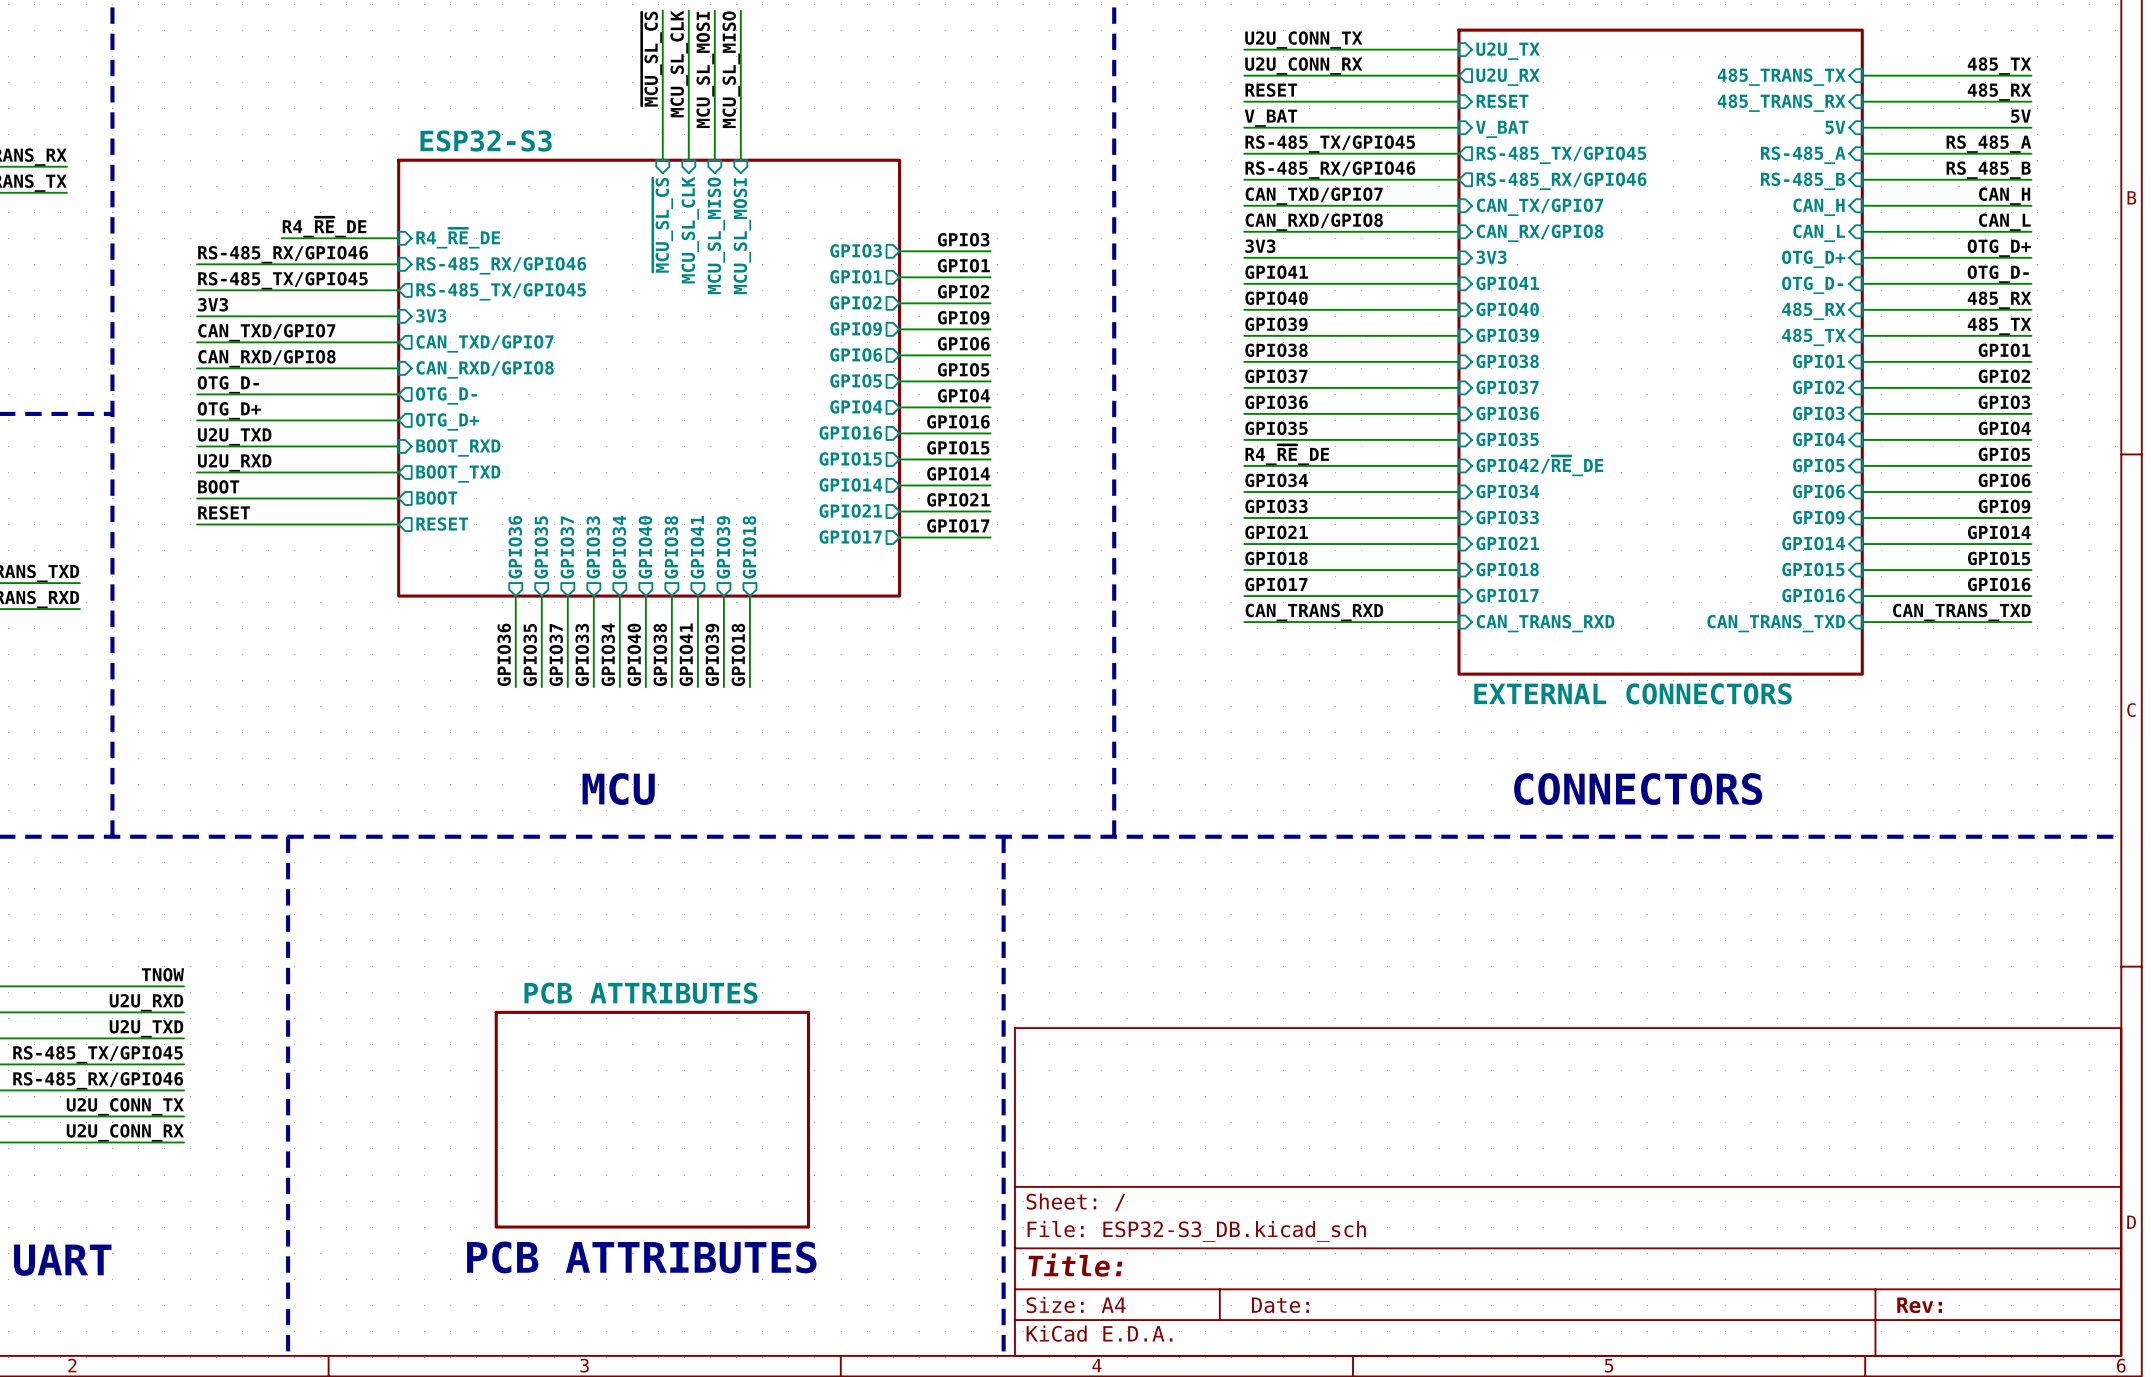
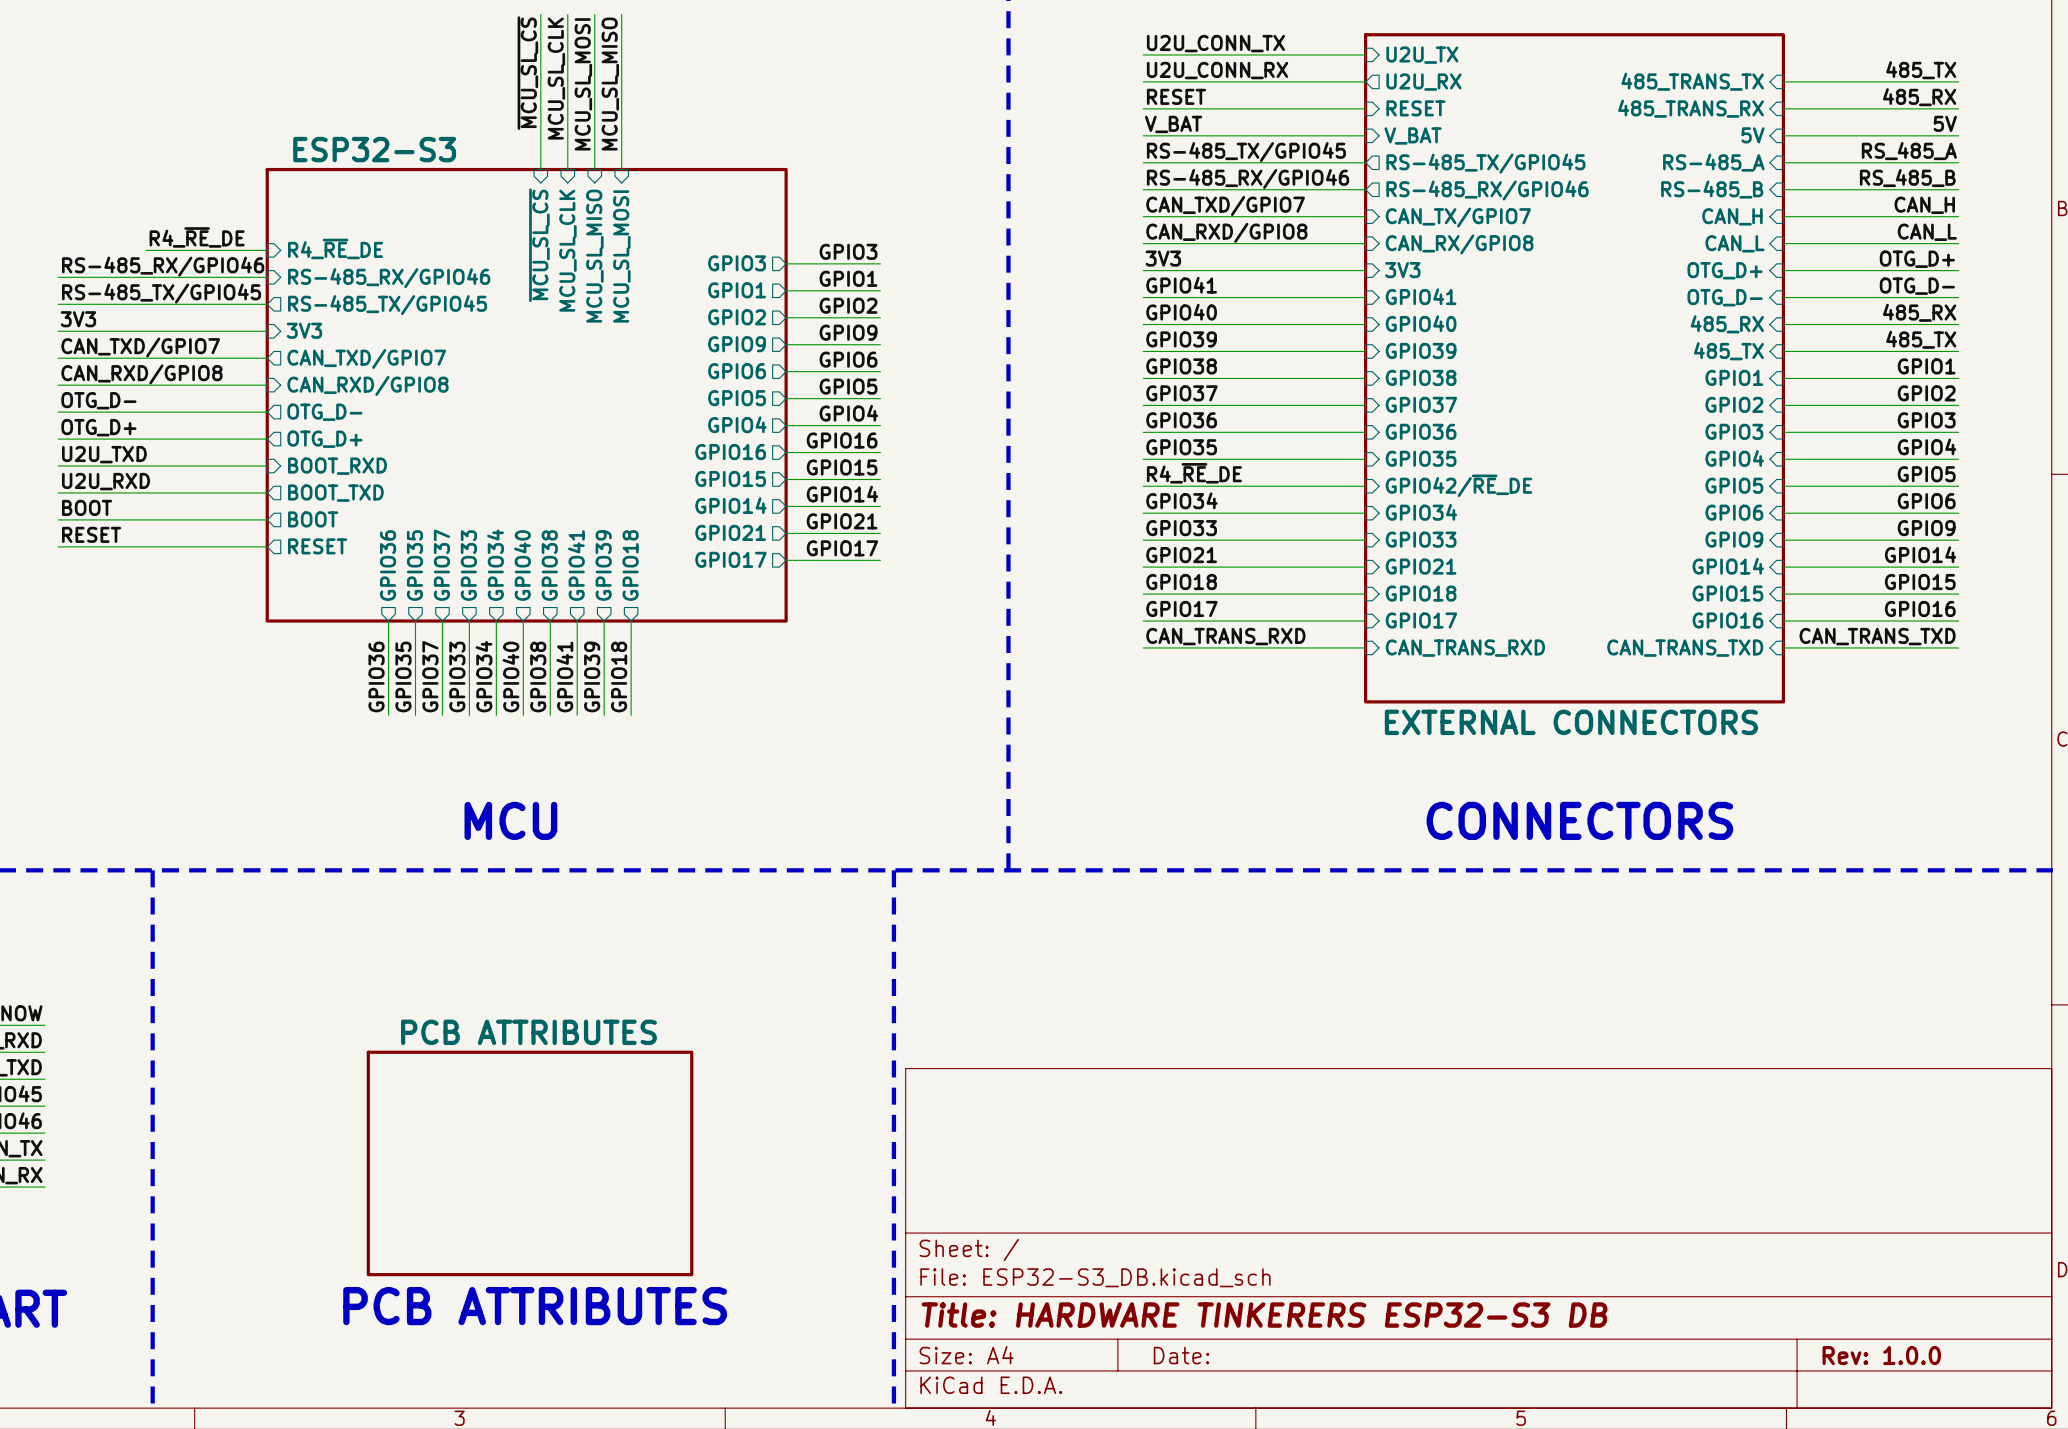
title block: Title: (1075, 1265) -> Title: HARDWARE TINKERERS ESP32-S3 DB (1264, 1315)
title block: Rev: (1919, 1305) -> Rev: 1.0.0 (1881, 1355)

